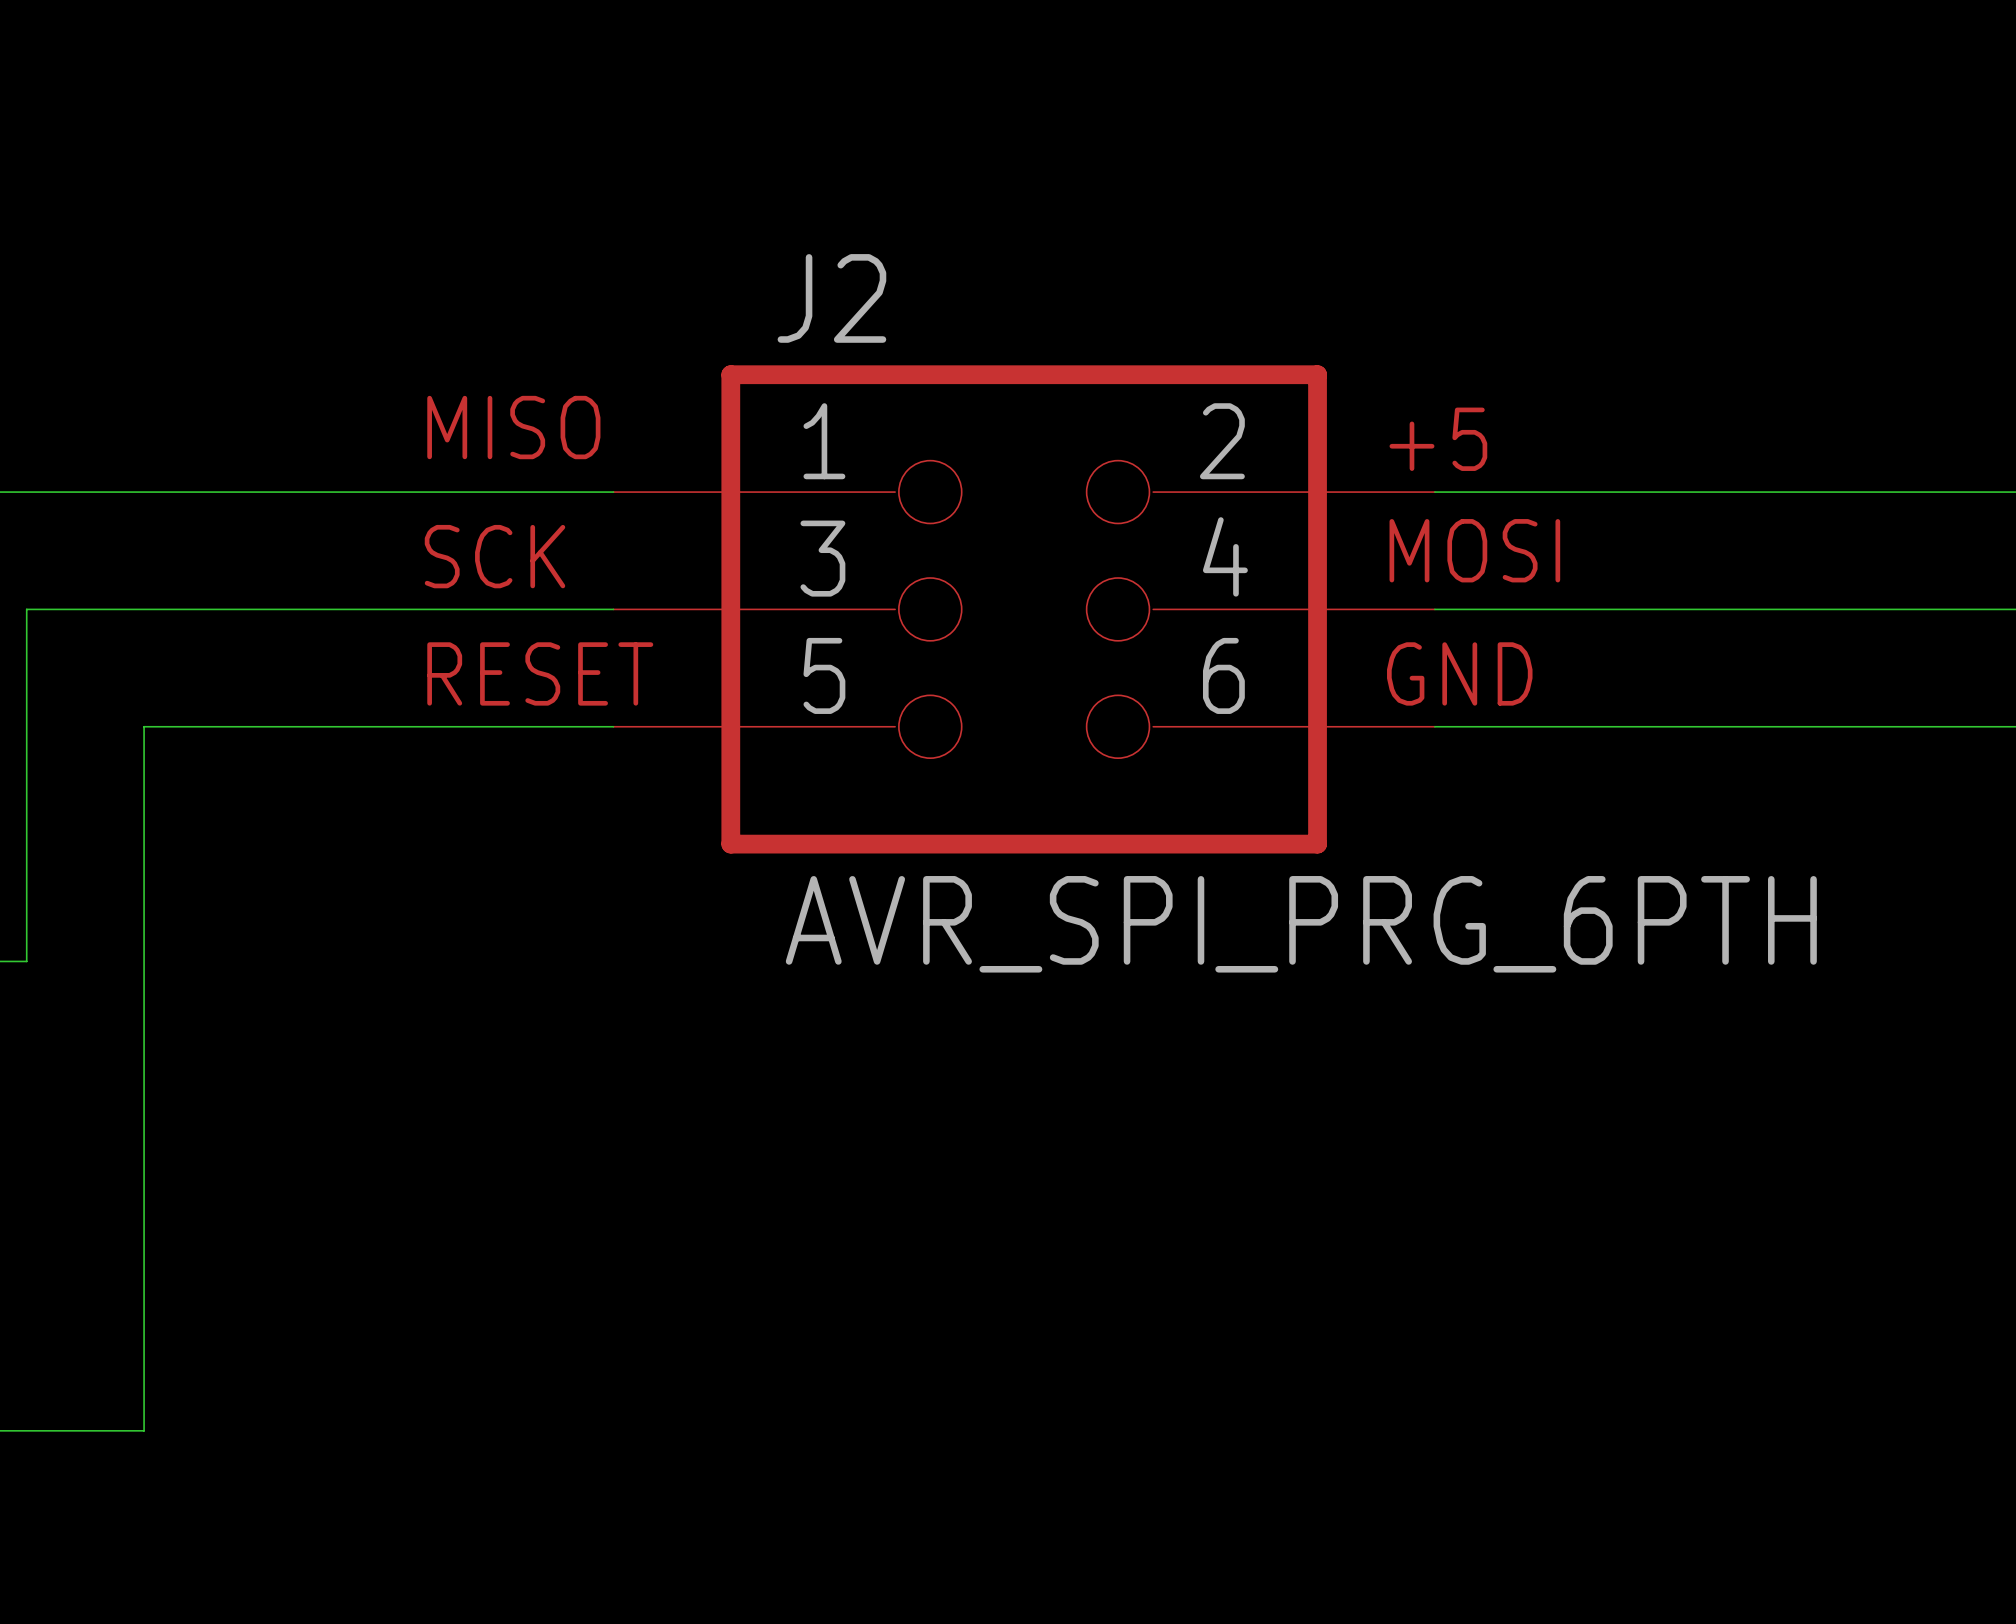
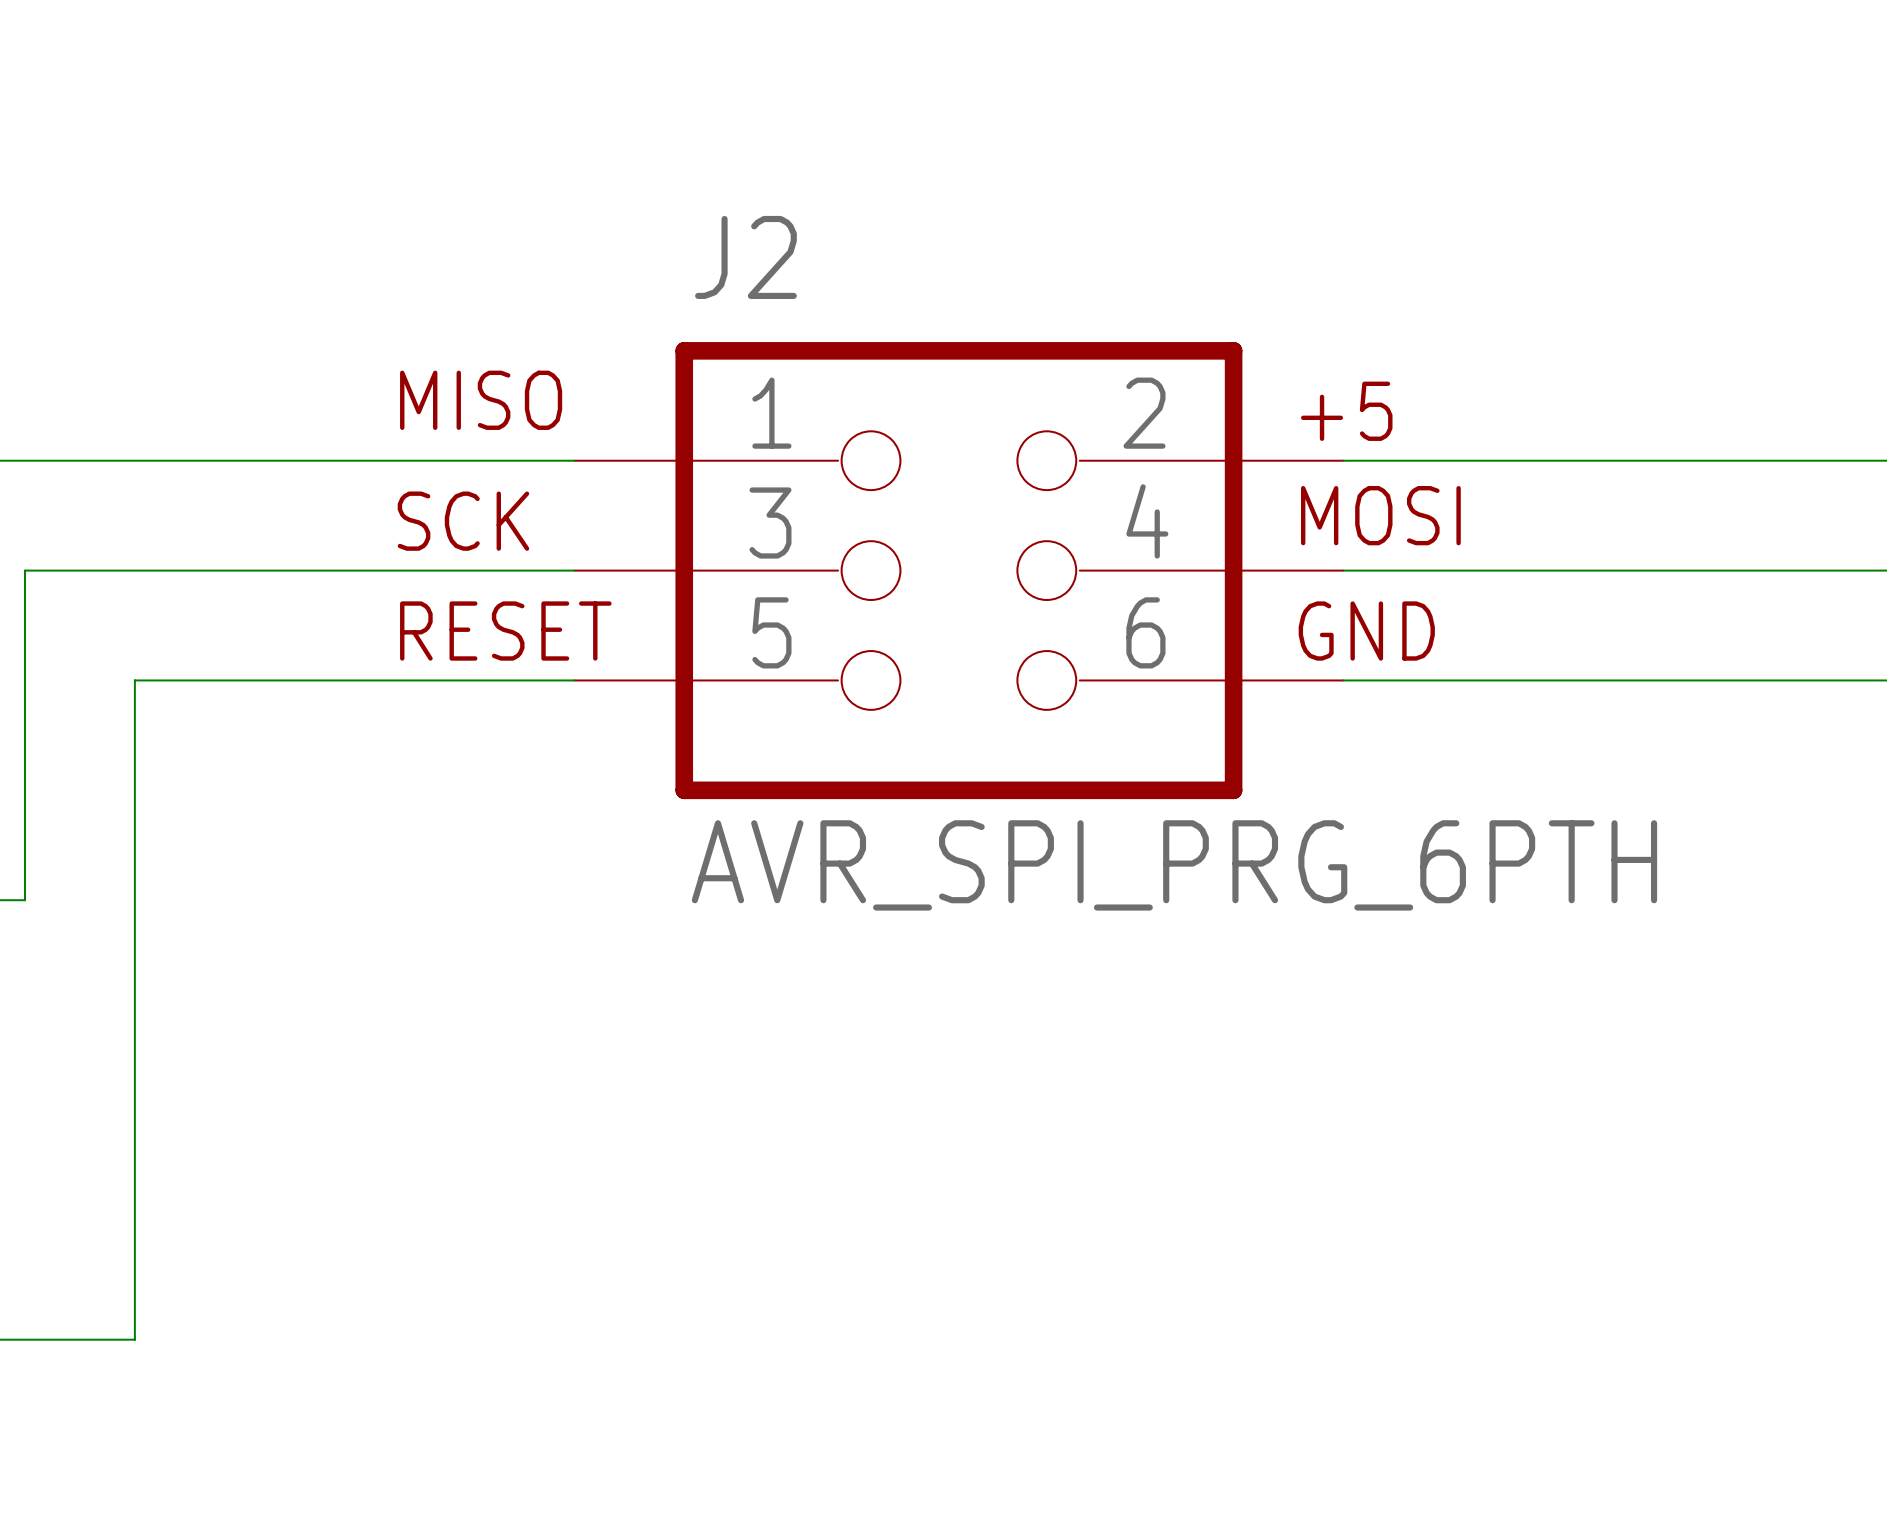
J2 name position: J2 (831, 298) -> J2 (745, 257)
J2 value position: AVR_SPI_PRG_6PTH (1301, 924) -> AVR_SPI_PRG_6PTH (1174, 865)

